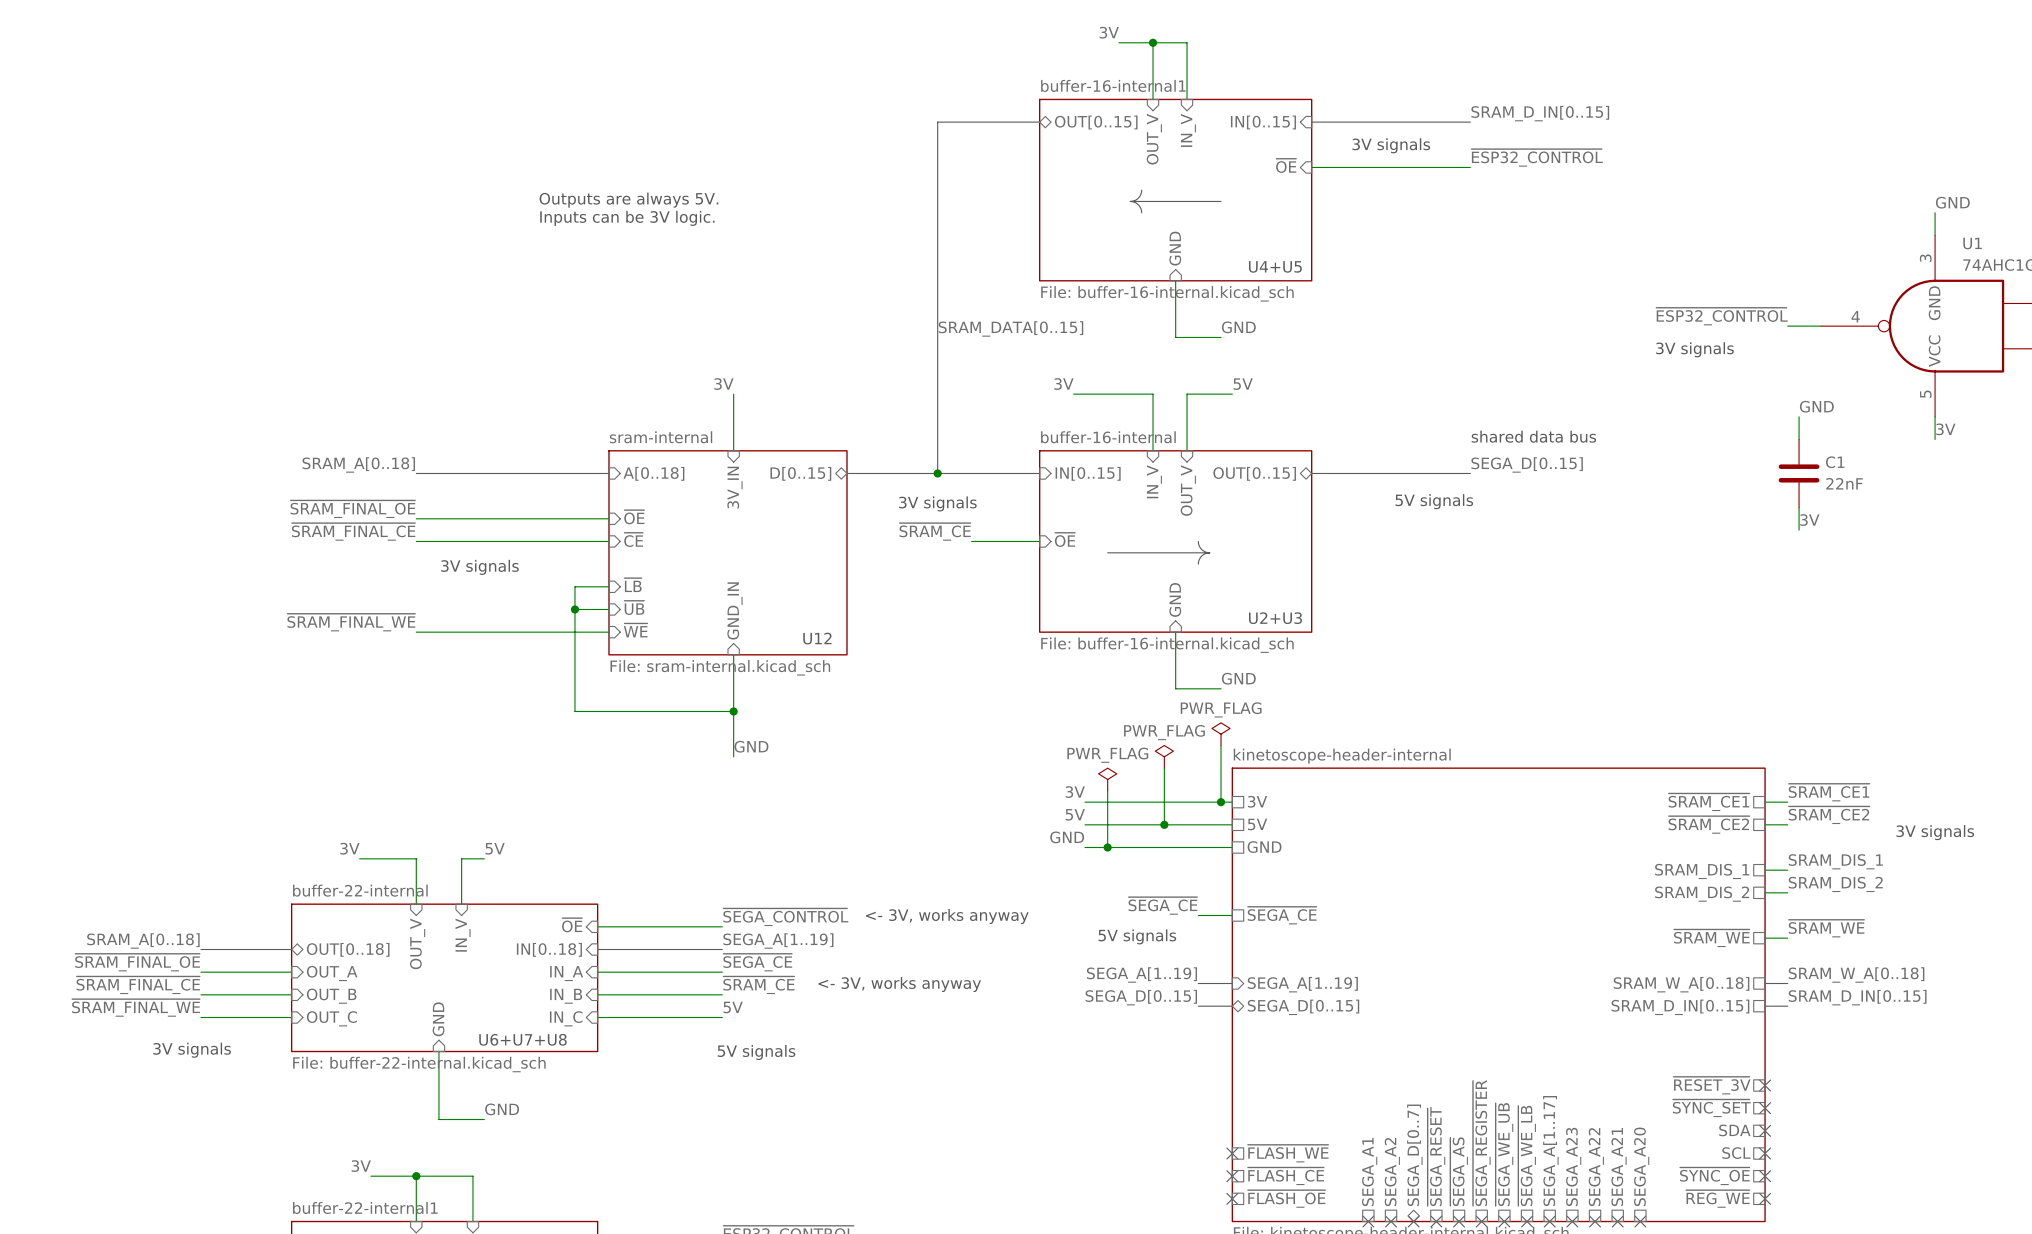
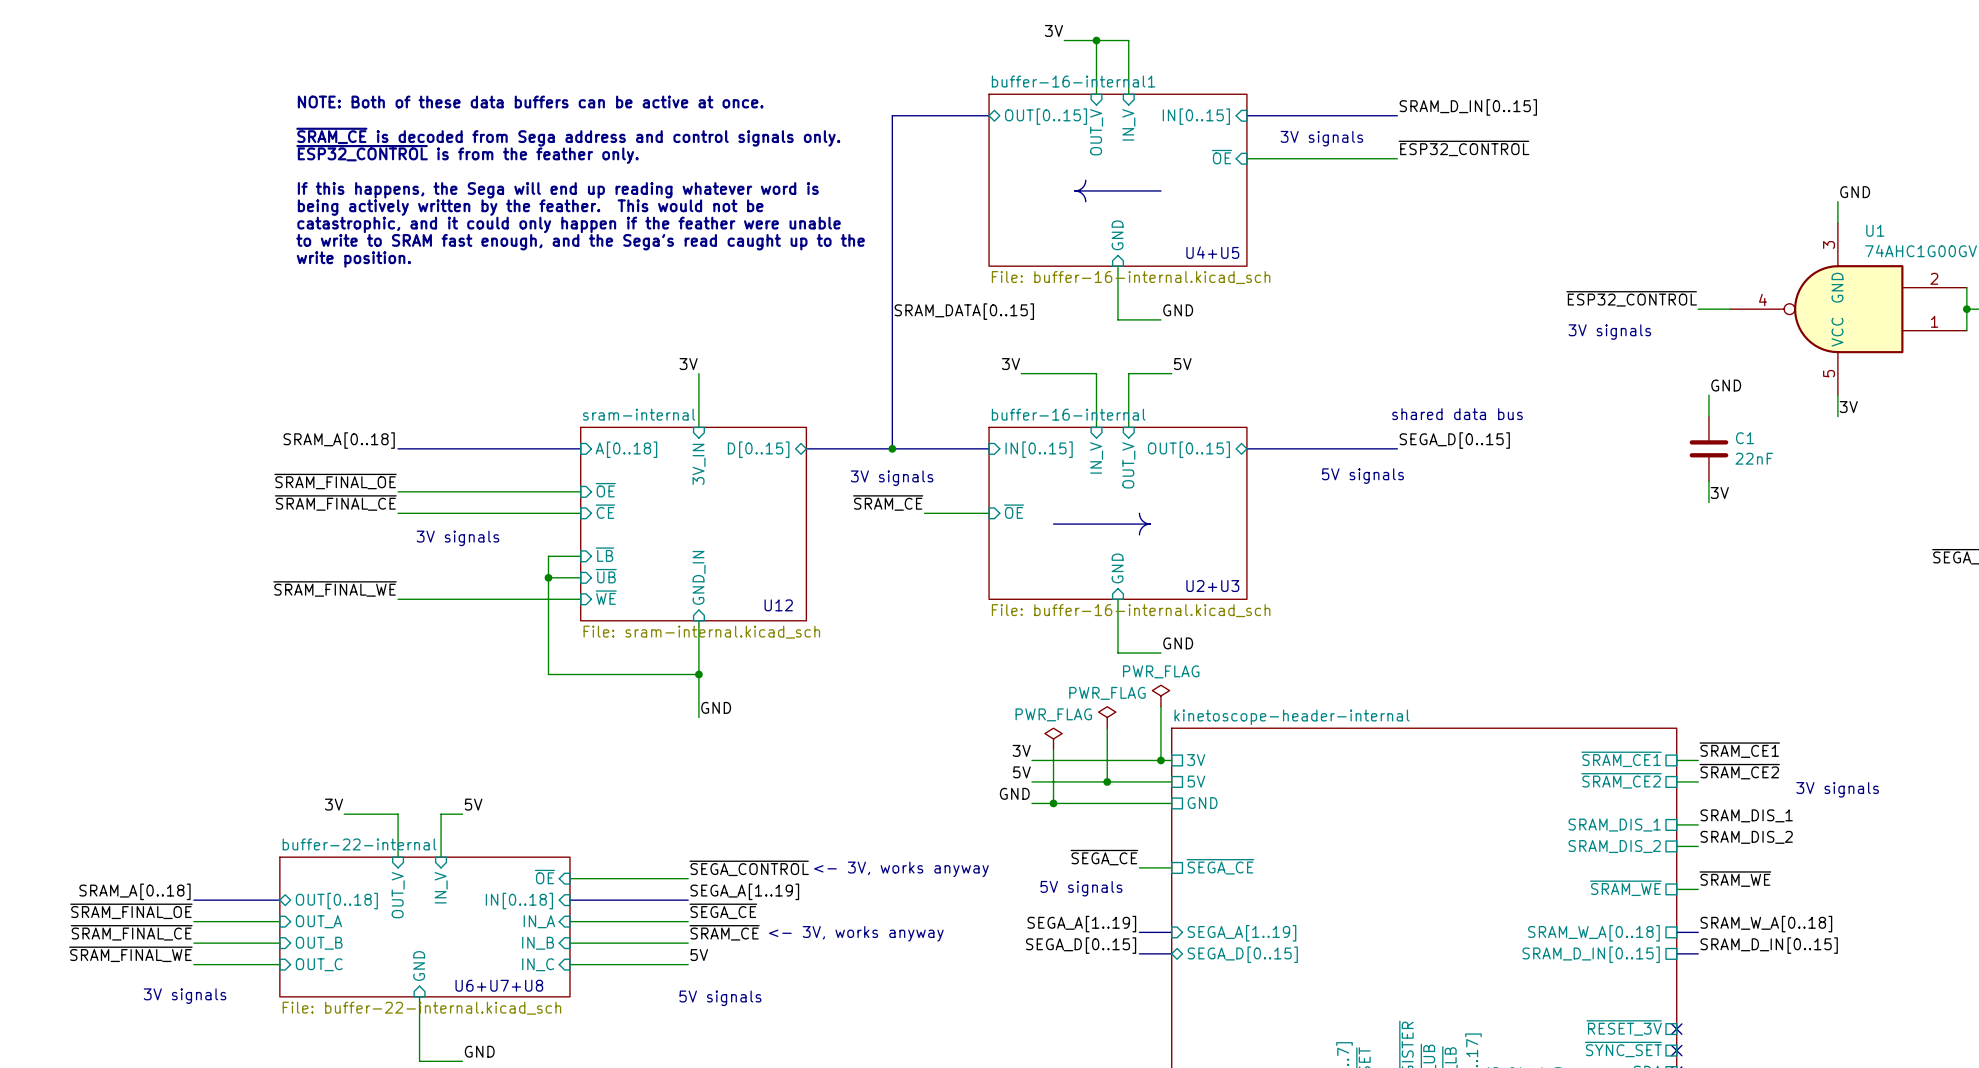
text: none -> NOTE: Both of these data buffers can be active at once. (530, 102)
text: none -> ~{SRAM_CE} is decoded from Sega address and control signals only. (568, 137)
text: none -> ~{ESP32_CONTROL} is from the feather only. (467, 154)
text: none -> If this happens, the Sega will end up reading whatever word is (558, 190)
text: Outputs are always 5V. (628, 200) -> none
text: none -> being actively written by the feather. This would not be (530, 207)
text: Inputs can be 3V logic. (627, 218) -> none
text: none -> catastrophic, and it could only happen if the feather were unable (569, 224)
text: none -> to write to SRAM fast enough, and the Sega's read caught up to the (580, 242)
text: none -> write position. (353, 259)

